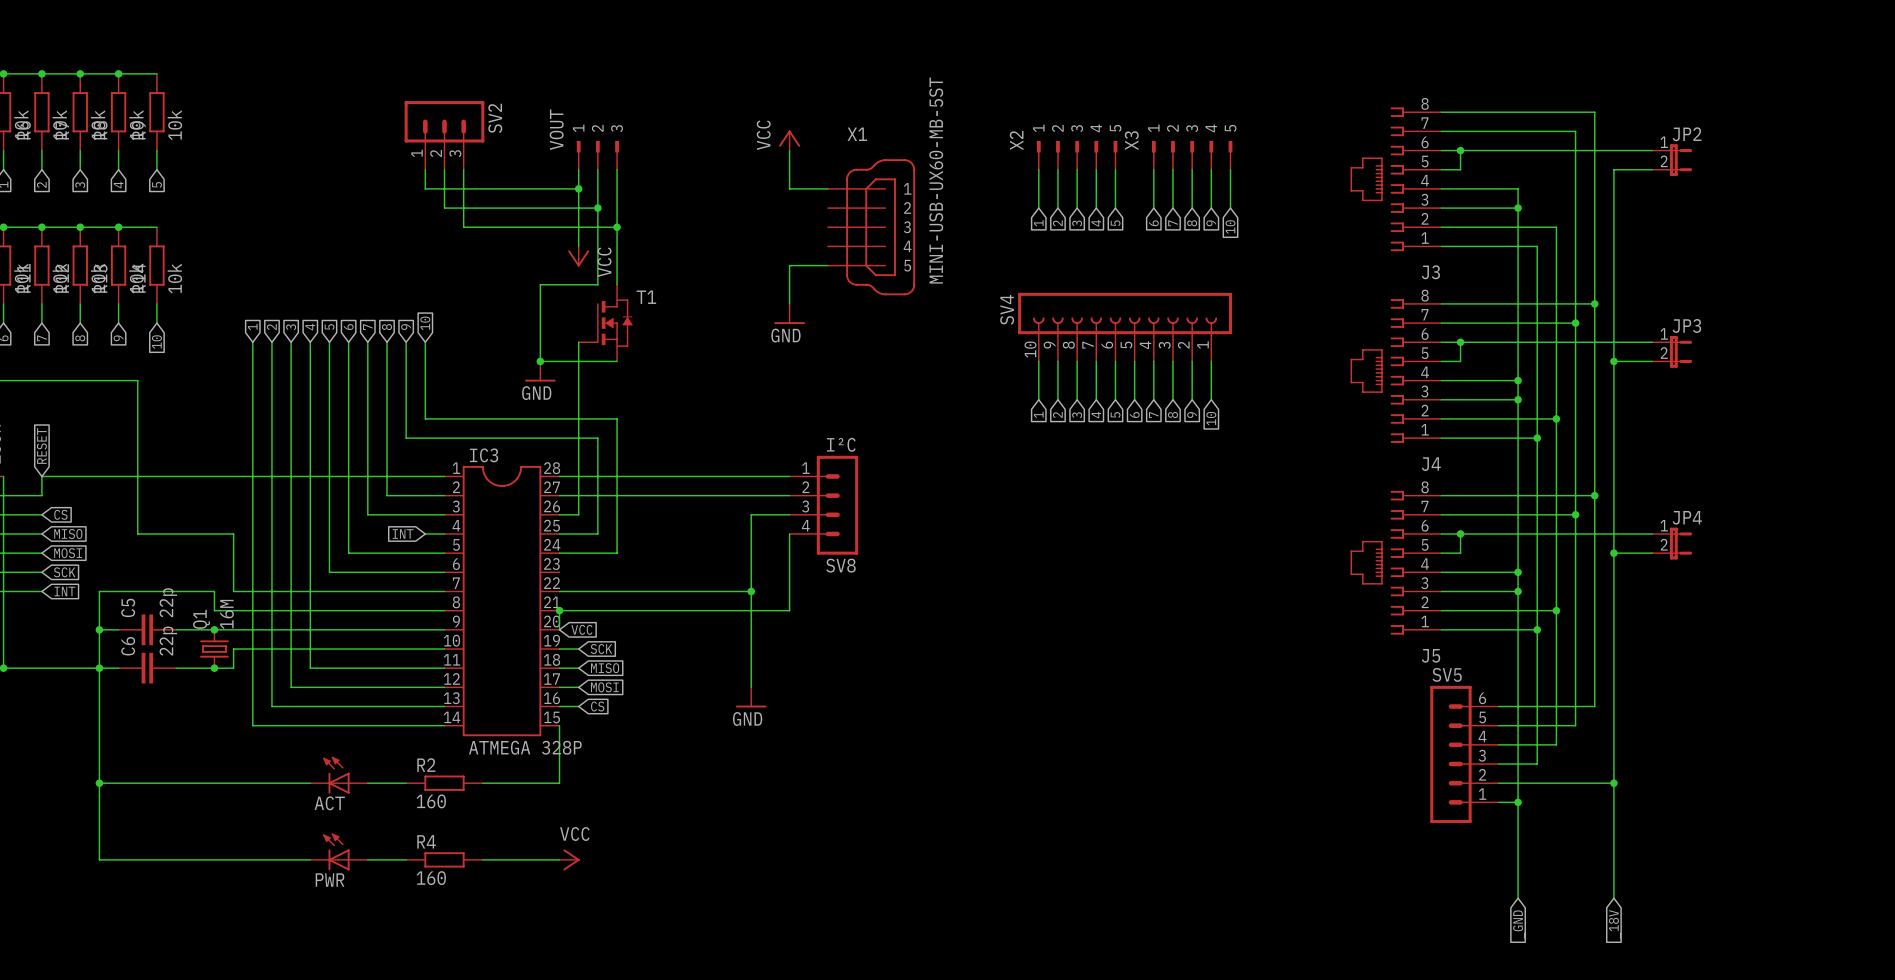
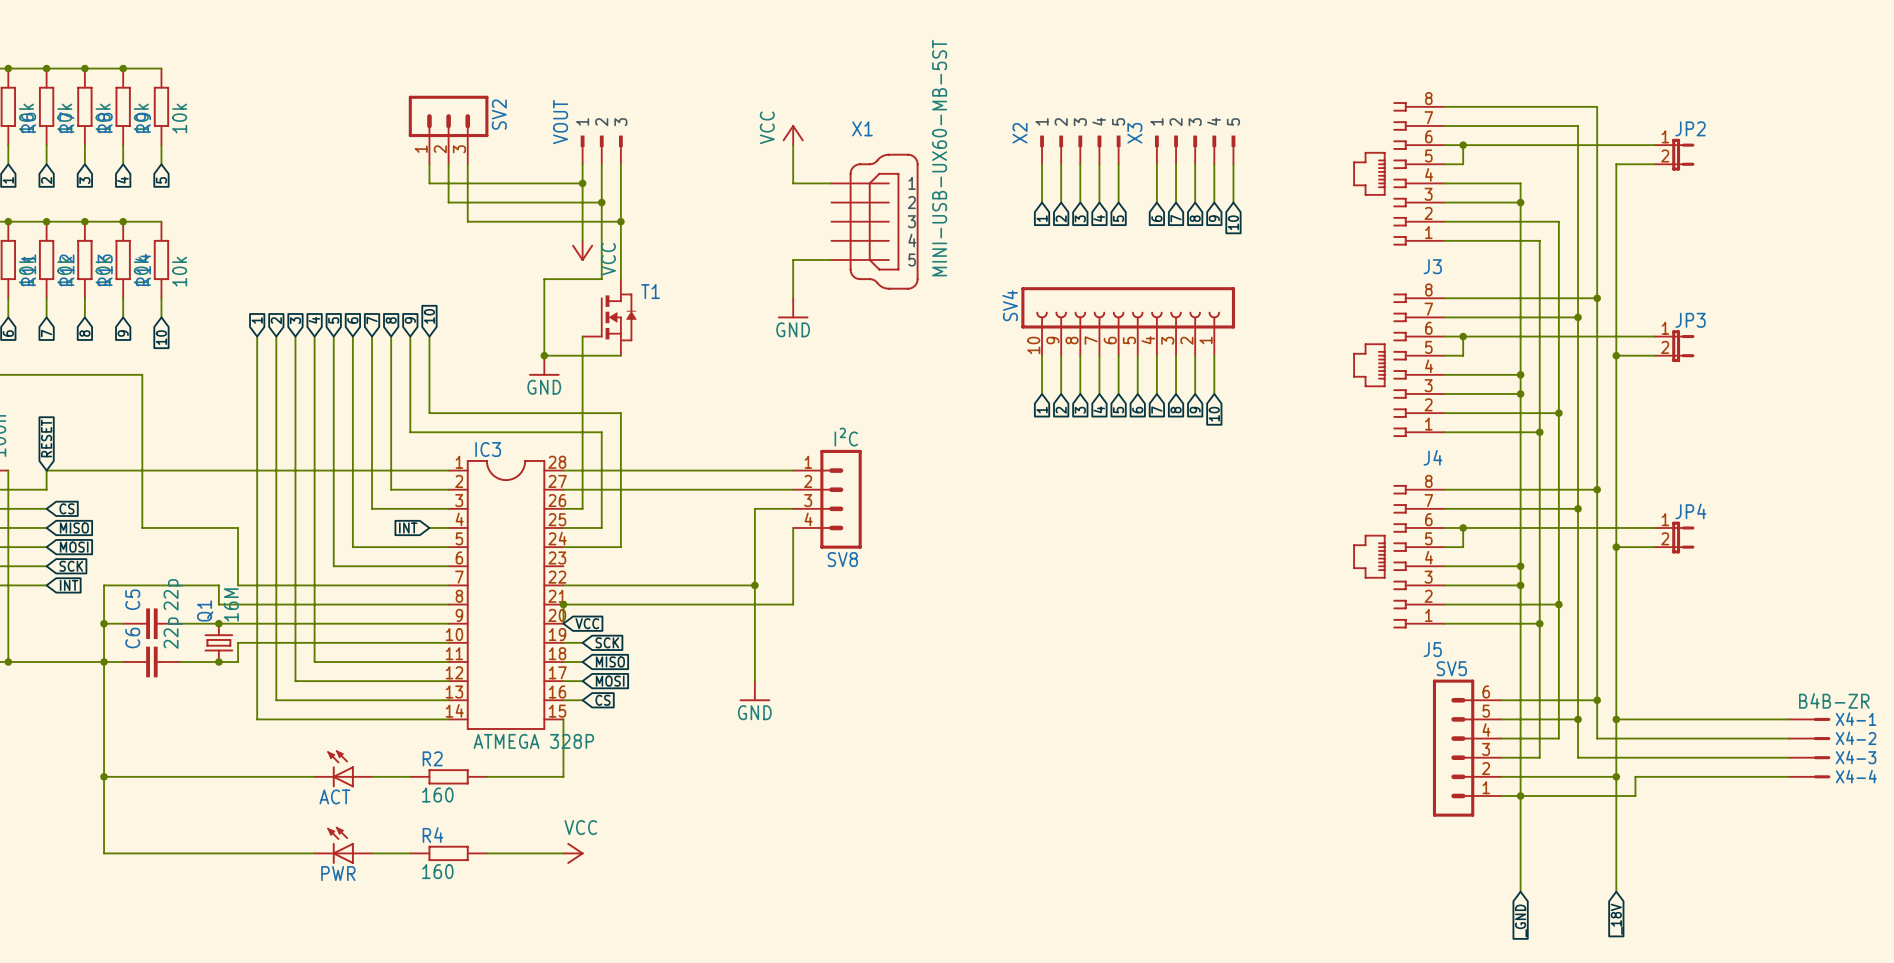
wire: none -> (1597, 700) (1597, 738) (1788, 738)
junction: none -> (1597, 700)
wire: none -> (1578, 719) (1578, 757) (1788, 757)
junction: none -> (1578, 719)
wire: none -> (1616, 719) (1788, 719)
junction: none -> (1616, 719)
X4-1: none -> B4B-ZR (1809, 719)
X4-2: none -> (1809, 738)
X4-3: none -> (1809, 757)
wire: none -> (1788, 776) (1635, 776) (1635, 795) (1520, 795)
X4-4: none -> (1809, 776)

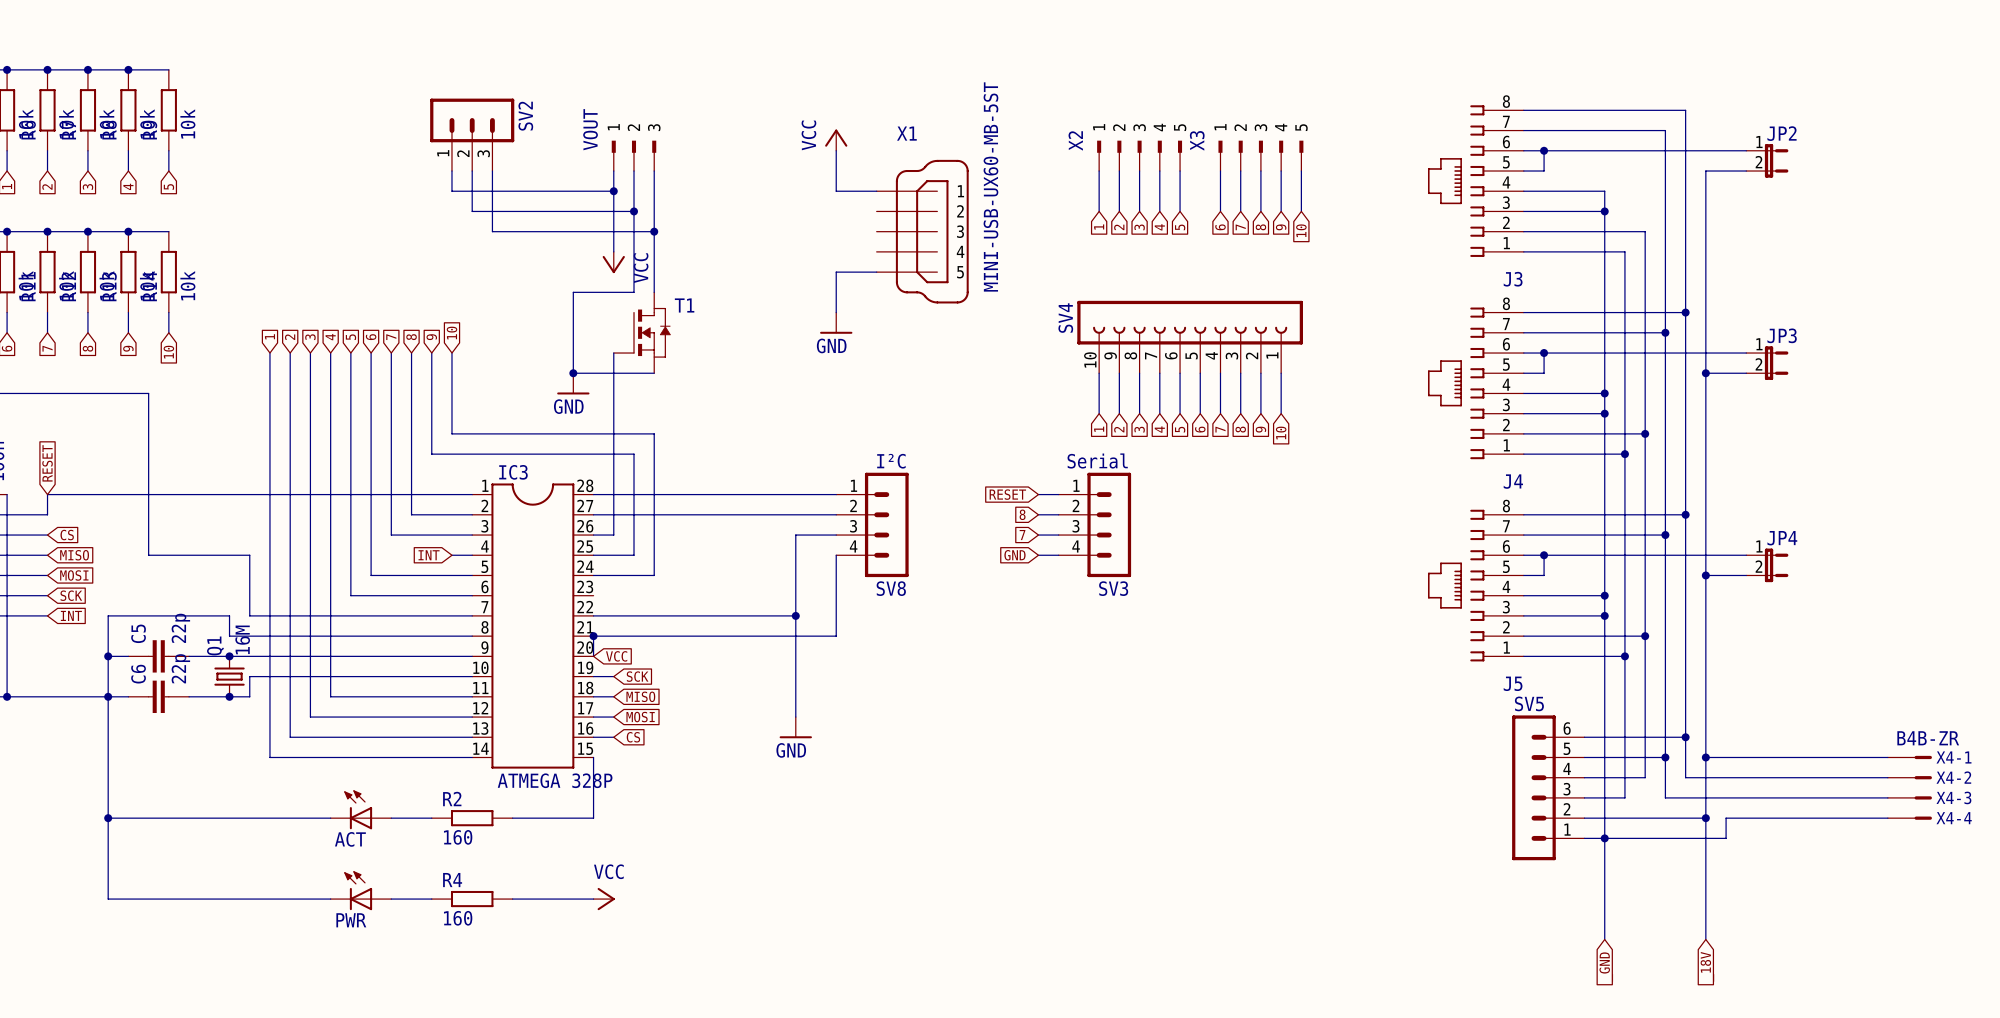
global label: none -> RESET (1007, 494)
wire: none -> (1038, 494) (1058, 494)
global label: none -> 8 (1022, 514)
wire: none -> (1038, 514) (1058, 514)
SV3: none -> Serial (1094, 524)
global label: none -> 7 (1022, 535)
wire: none -> (1038, 535) (1058, 535)
global label: none -> GND (1014, 555)
wire: none -> (1038, 555) (1058, 555)

